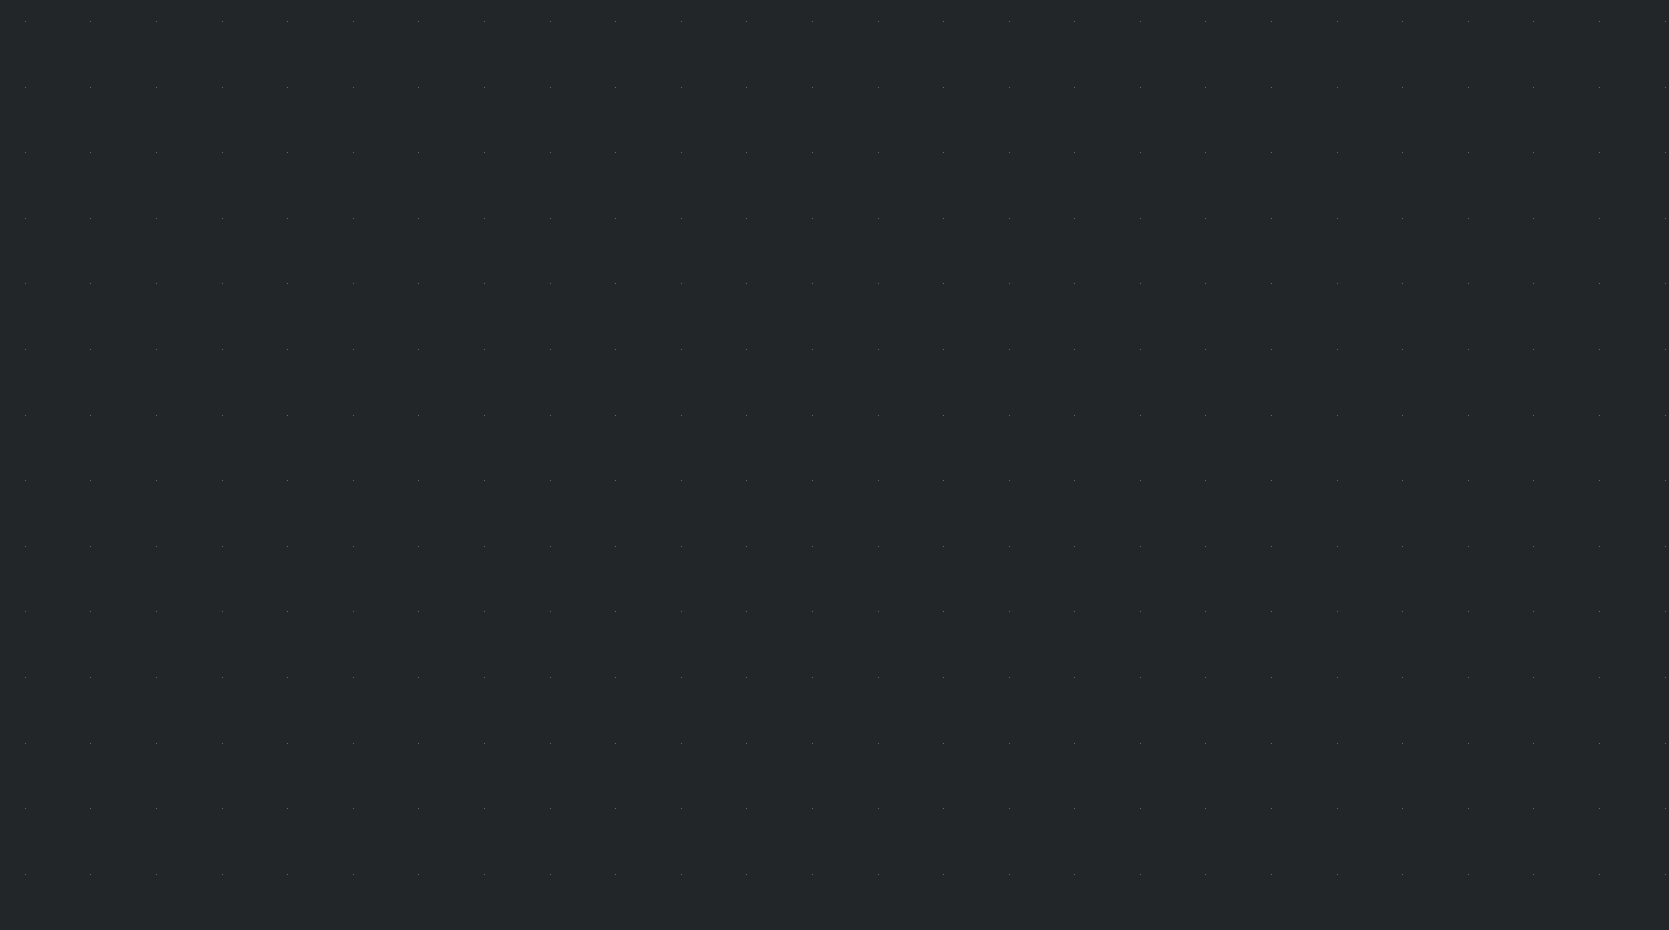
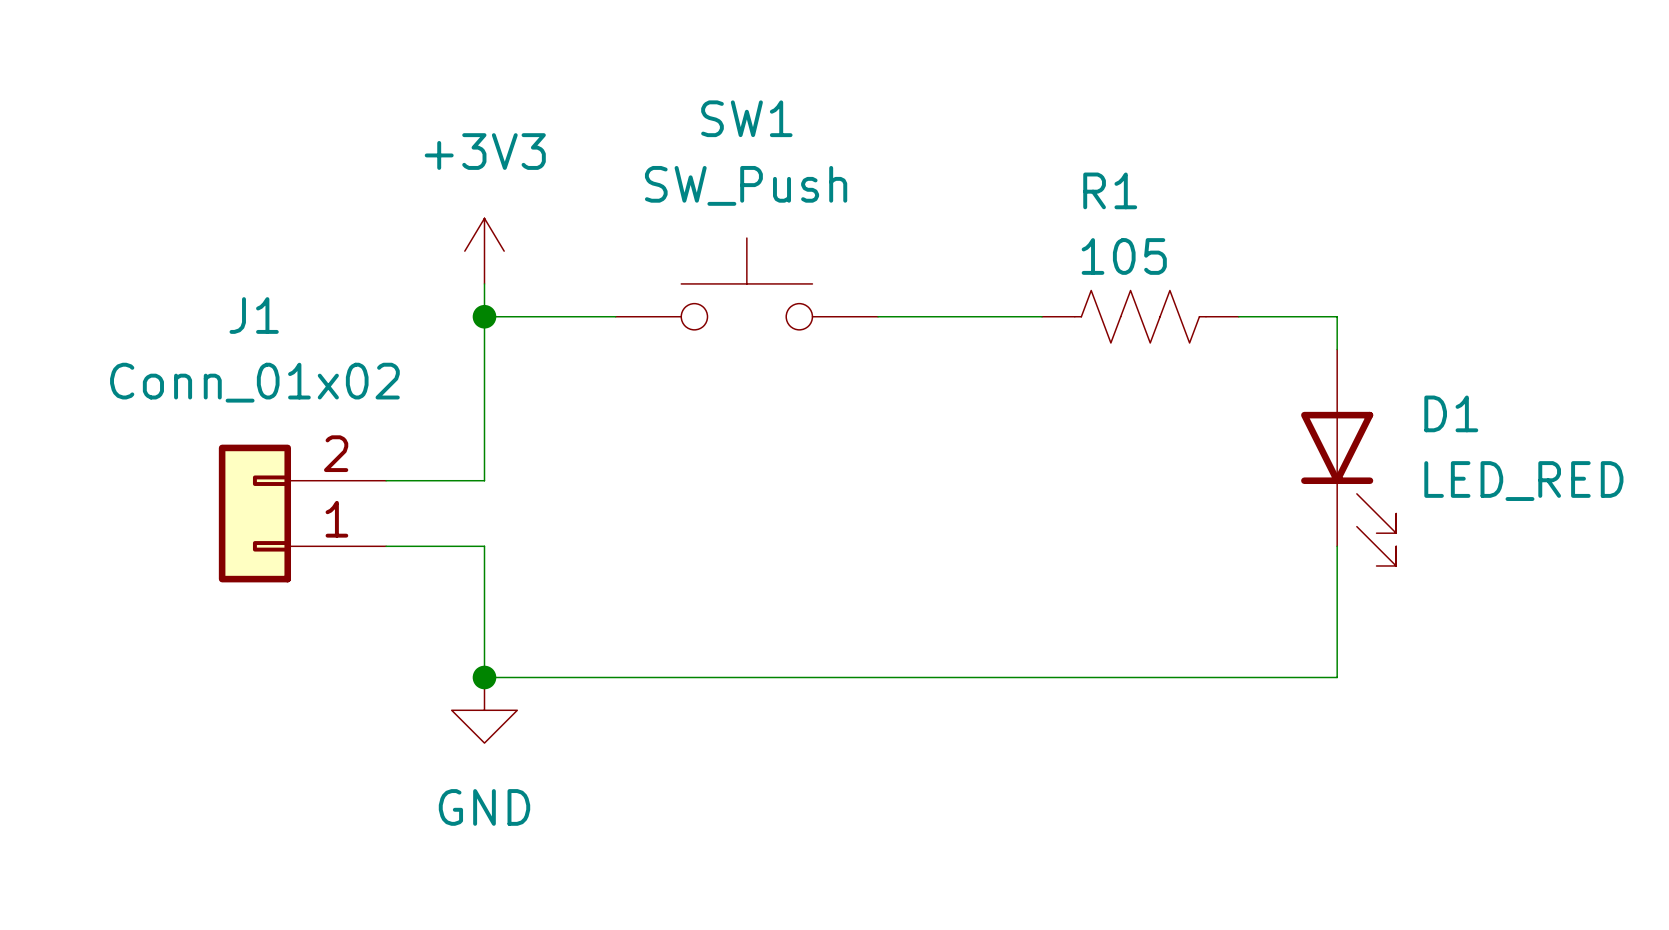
power symbol: none -> +3V3 (484, 251)
wire: none -> (484, 283) (484, 480) (386, 480)
SW1: none -> SW_Push (746, 283)
wire: none -> (484, 316) (615, 316)
junction: none -> (484, 316)
wire: none -> (878, 316) (1042, 316)
R1: none -> 105 (1140, 316)
wire: none -> (1238, 316) (1337, 316) (1337, 349)
D1: none -> LED_RED (1348, 457)
J1: none -> Conn_01x02 (302, 513)
wire: none -> (386, 546) (484, 546) (484, 677) (1337, 677) (1337, 546)
junction: none -> (484, 677)
power symbol: none -> GND (484, 710)

